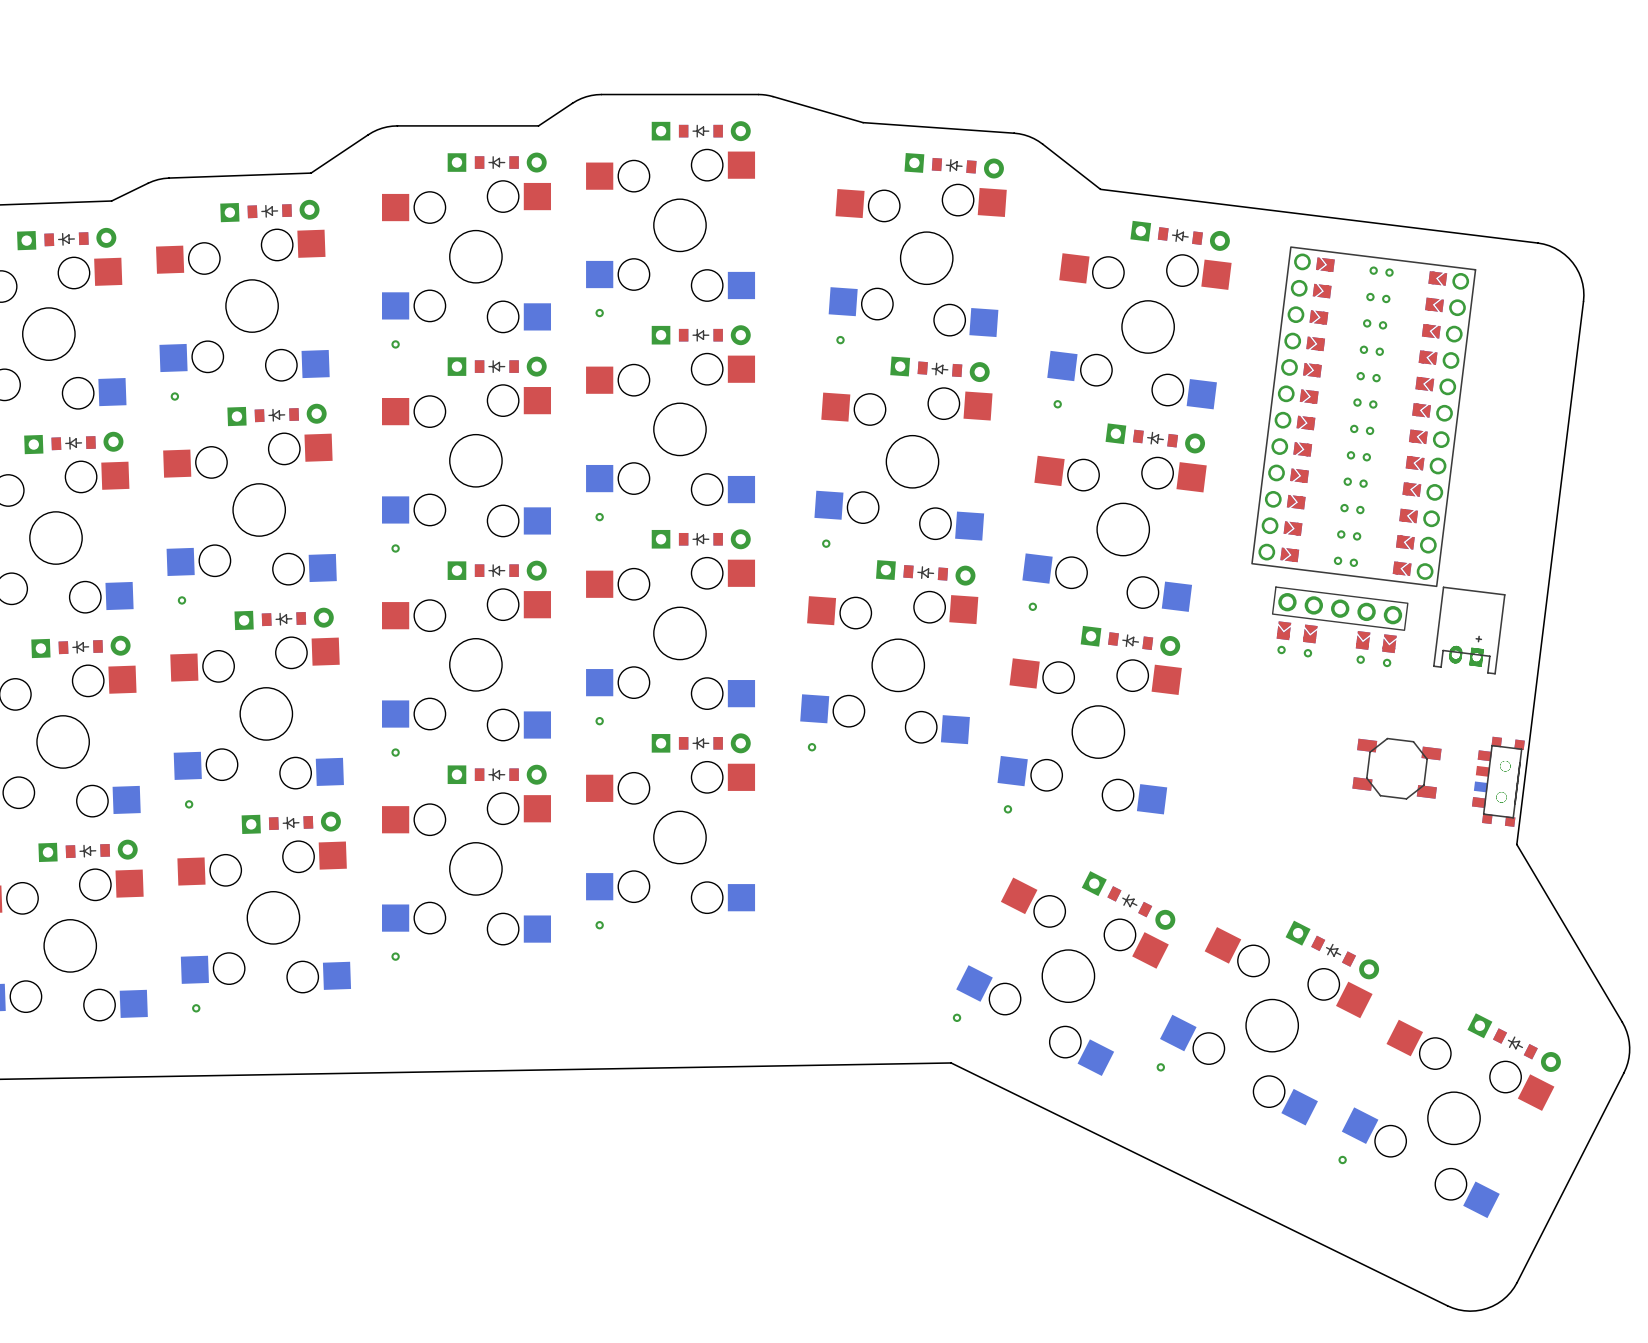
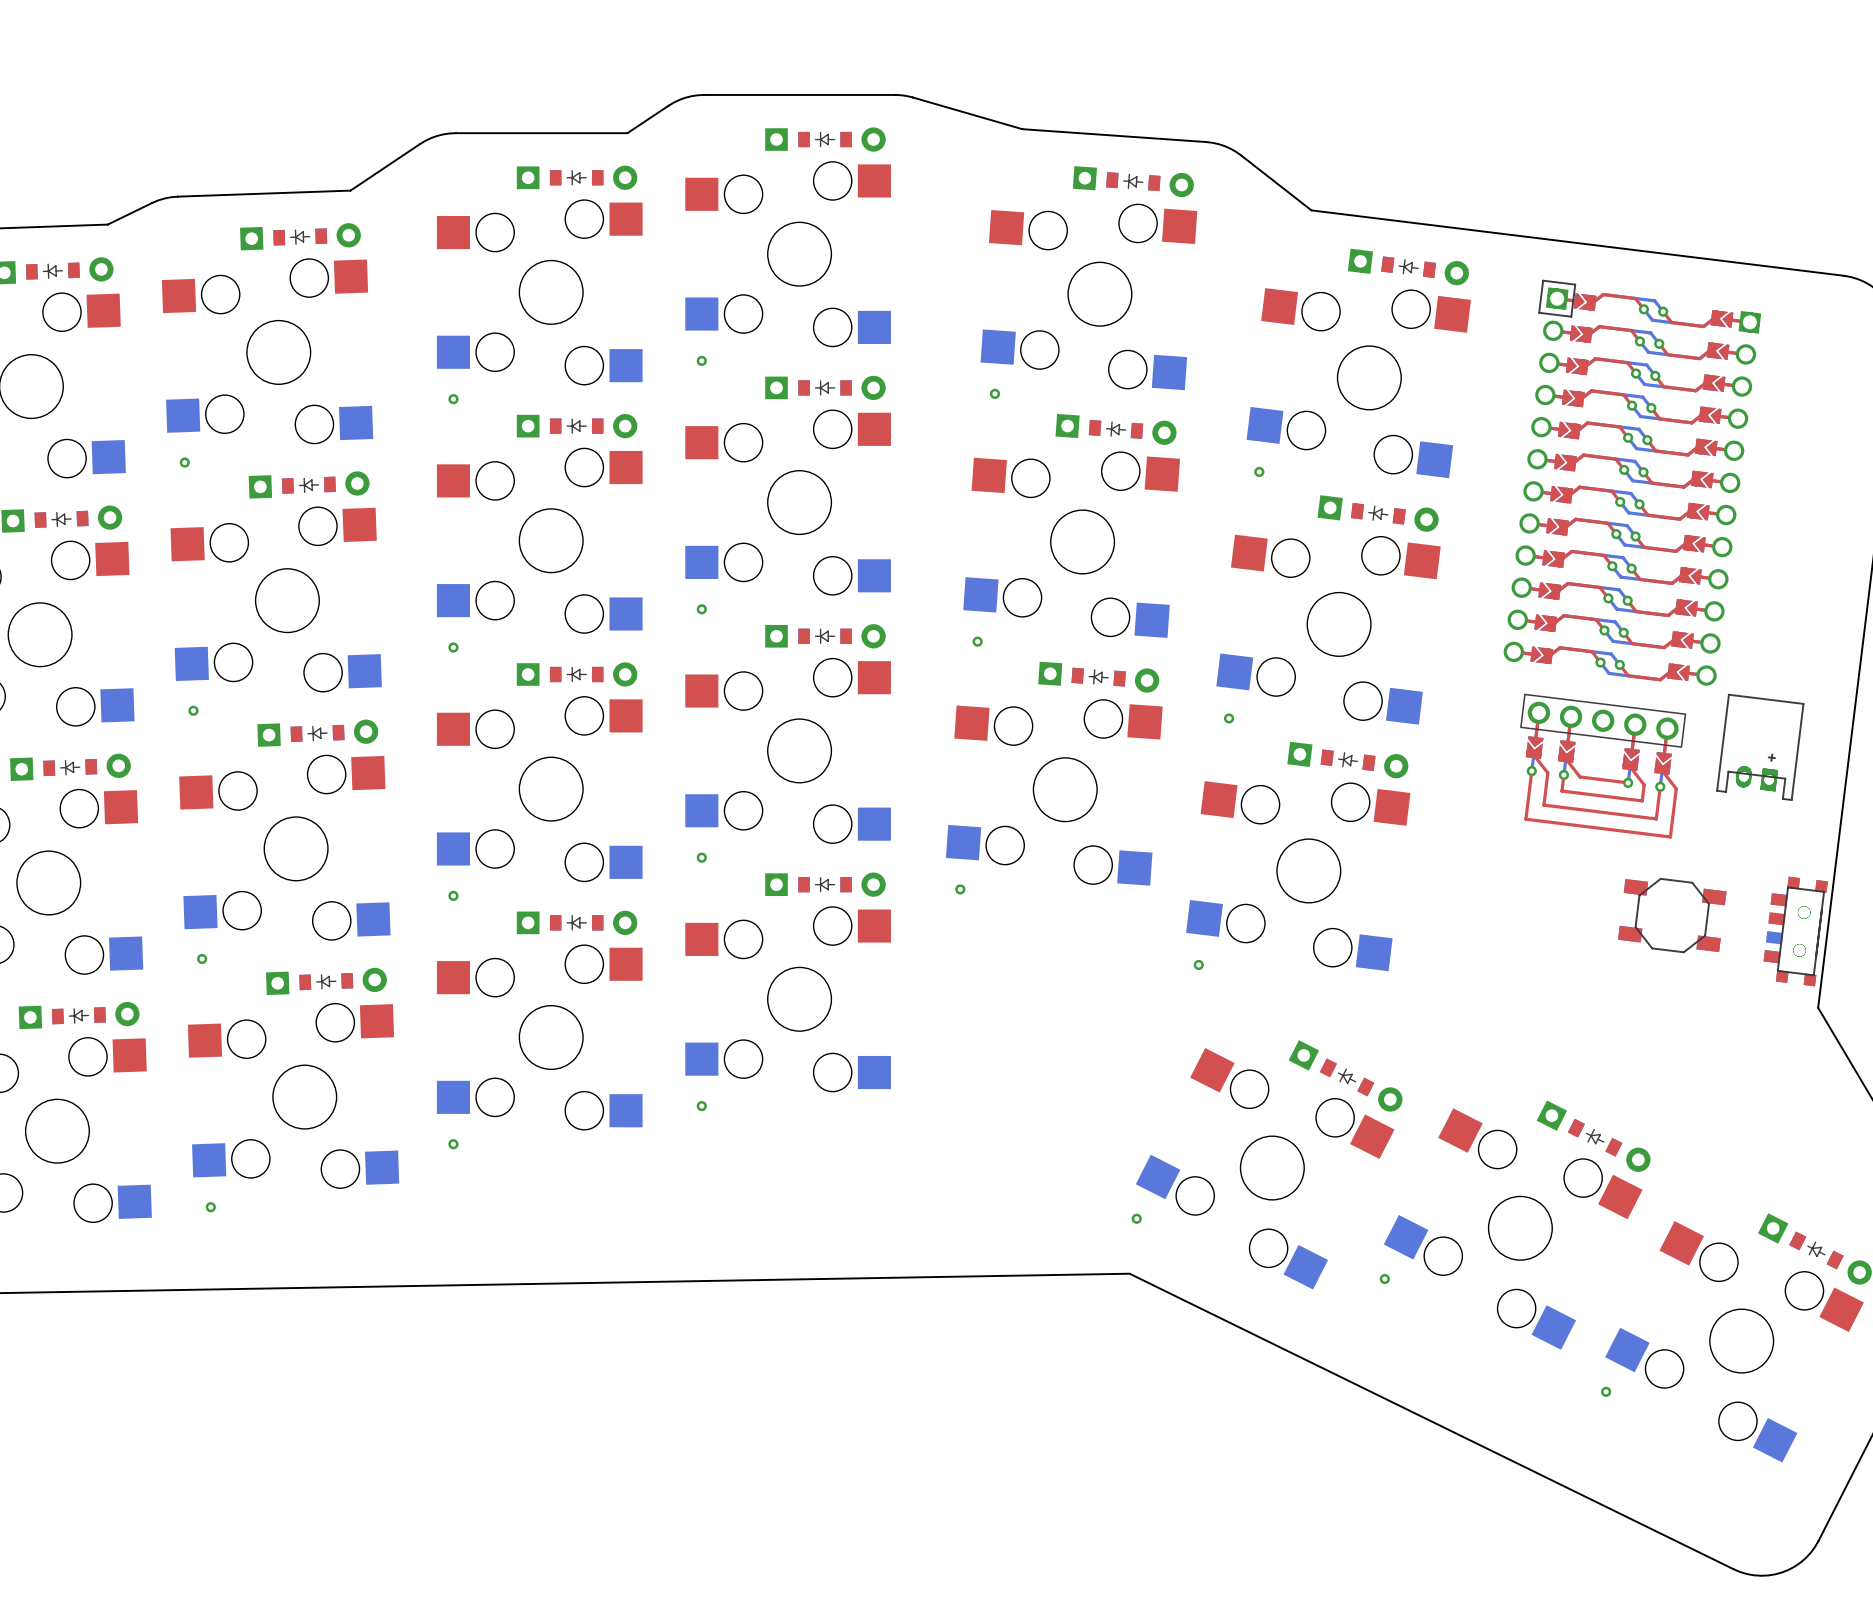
part footprint: [1251, 246, 1477, 588] -> [1503, 279, 1762, 686]
part: (1340, 626) -> none
part: none -> (1603, 766)

